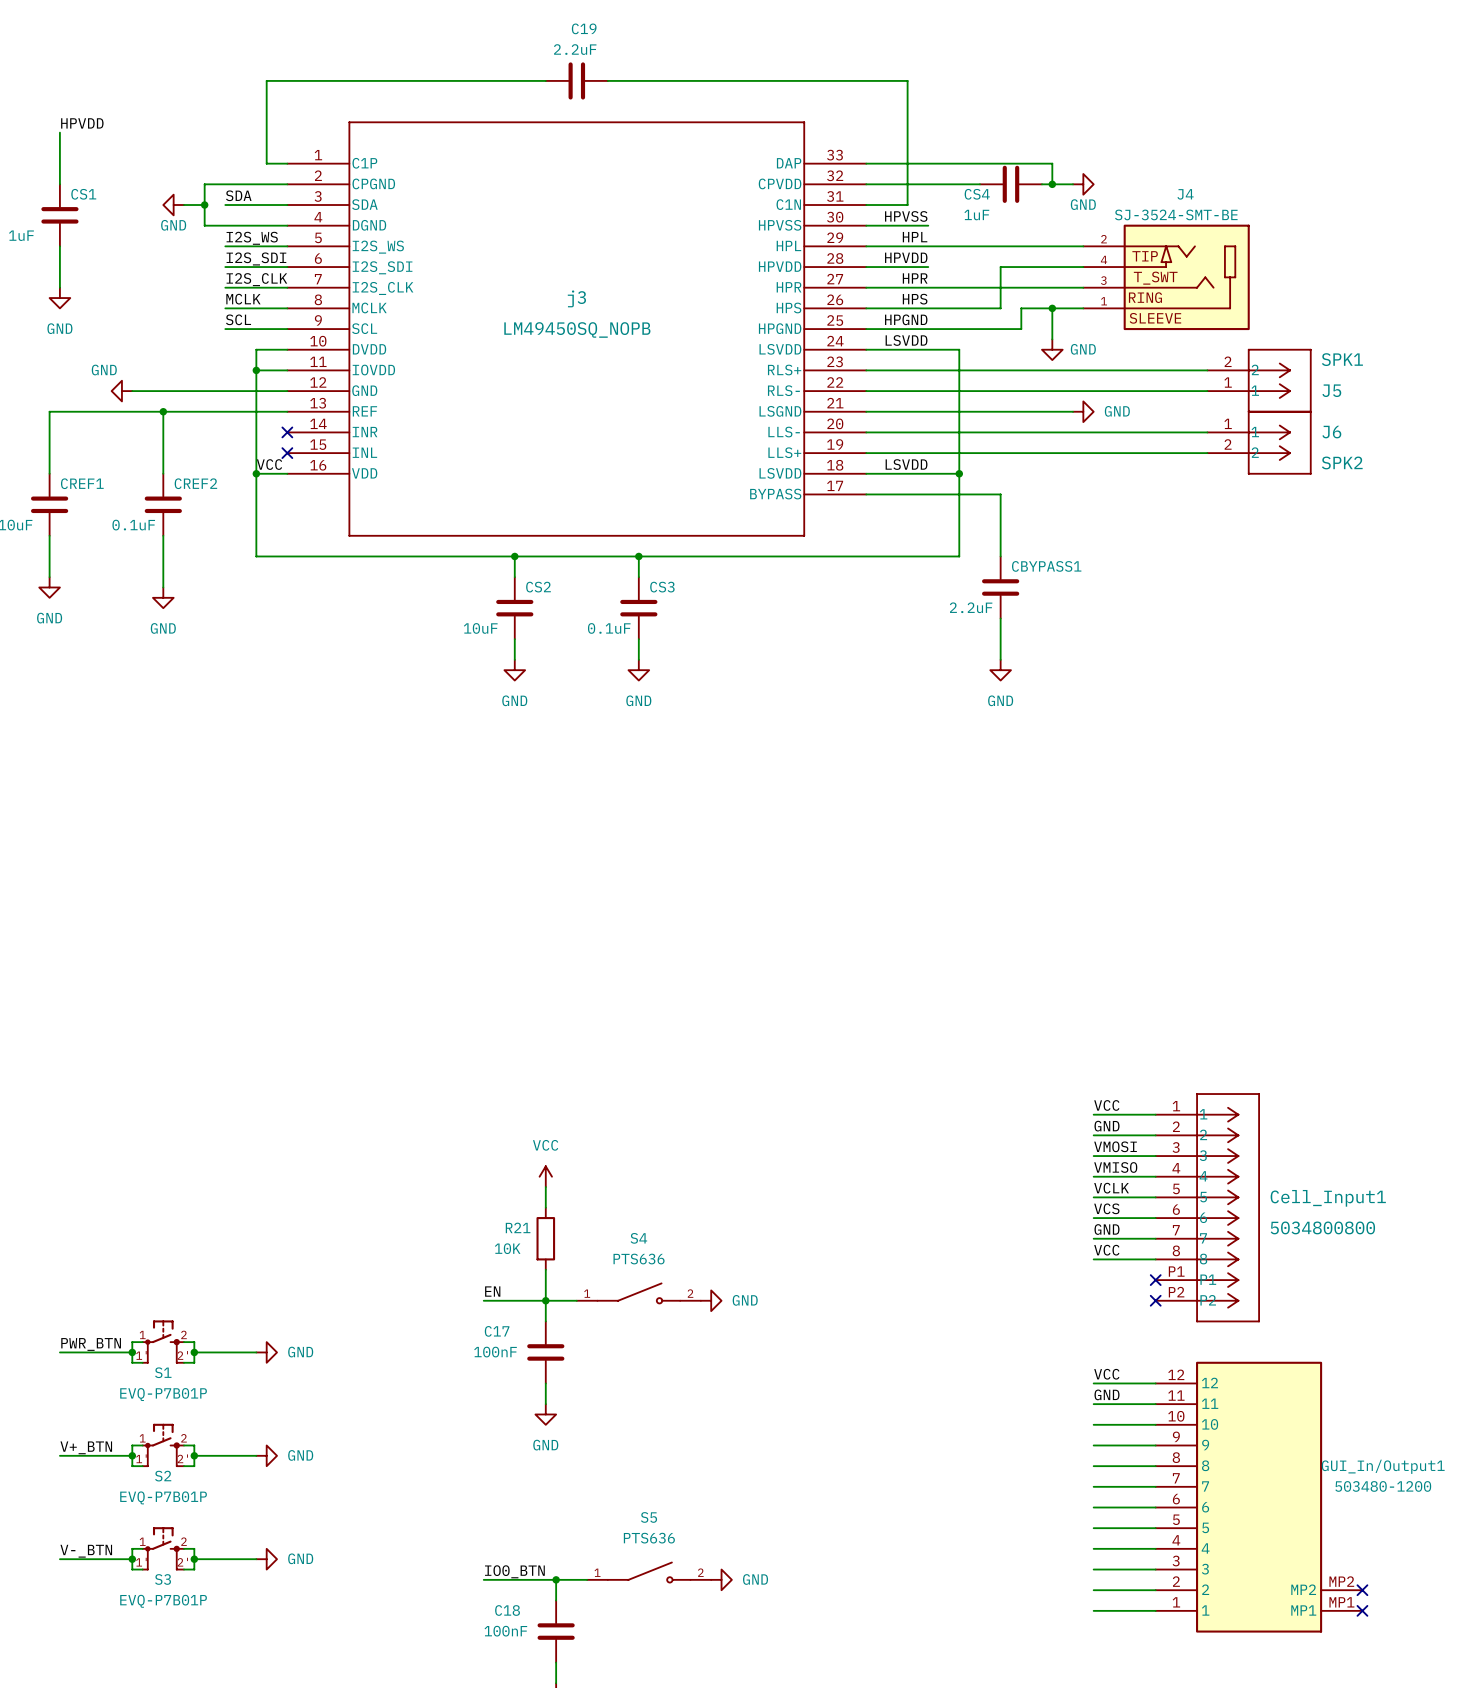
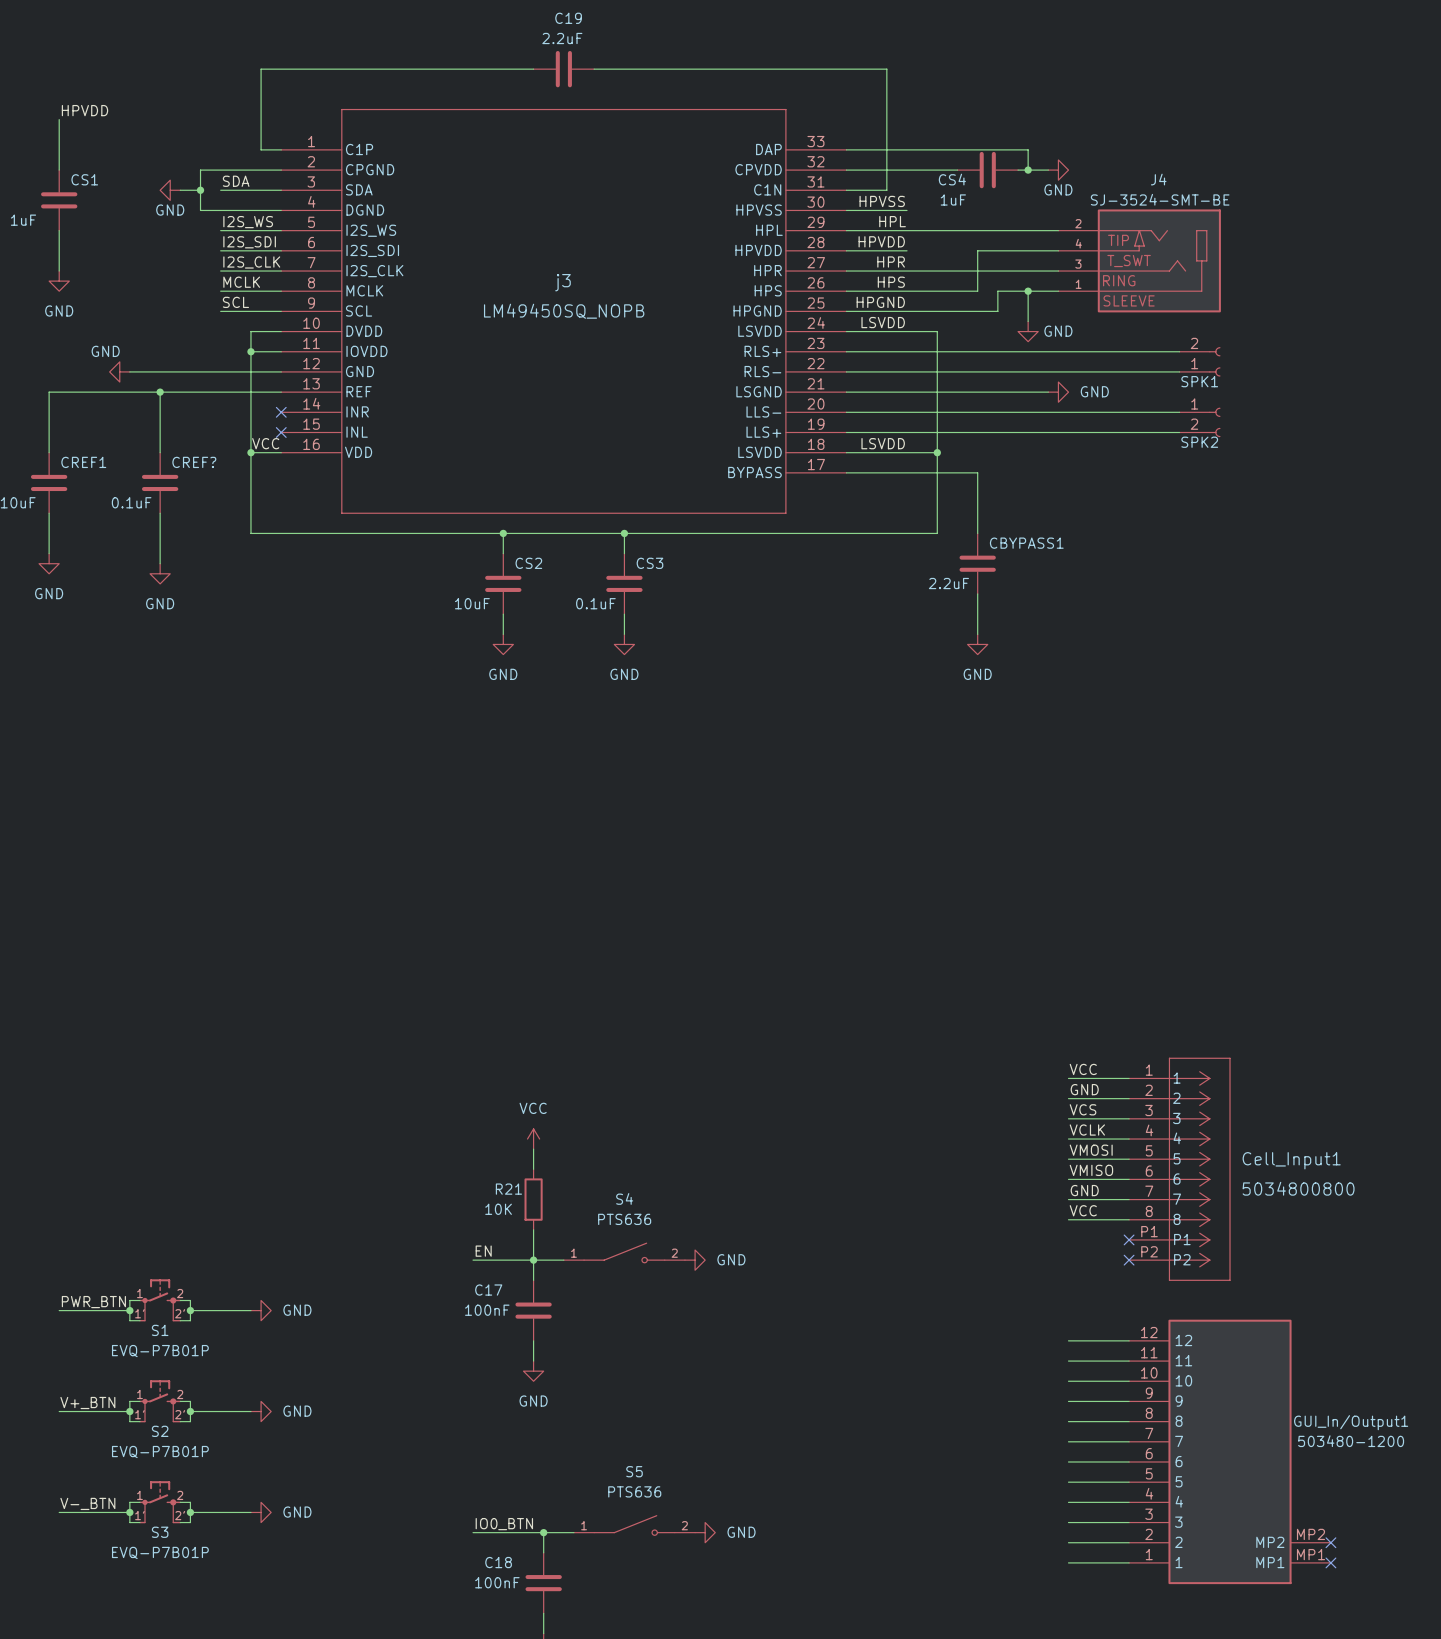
SPK1: none -> (1200, 361)
J5: SPK1 (1259, 380) -> none
SPK2: none -> (1200, 422)
J6: SPK2 (1259, 442) -> none
CREF2 name: CREF2 (195, 483) -> CREF? (194, 462)
label: VMOSI (1115, 1146) -> VCS (1083, 1109)
label: VMISO (1115, 1167) -> VCLK (1087, 1130)
label: VCLK (1111, 1188) -> VMOSI (1091, 1150)
label: VCS (1106, 1208) -> VMISO (1091, 1170)
label: VCC (1106, 1374) -> none
label: GND (1107, 1394) -> none

